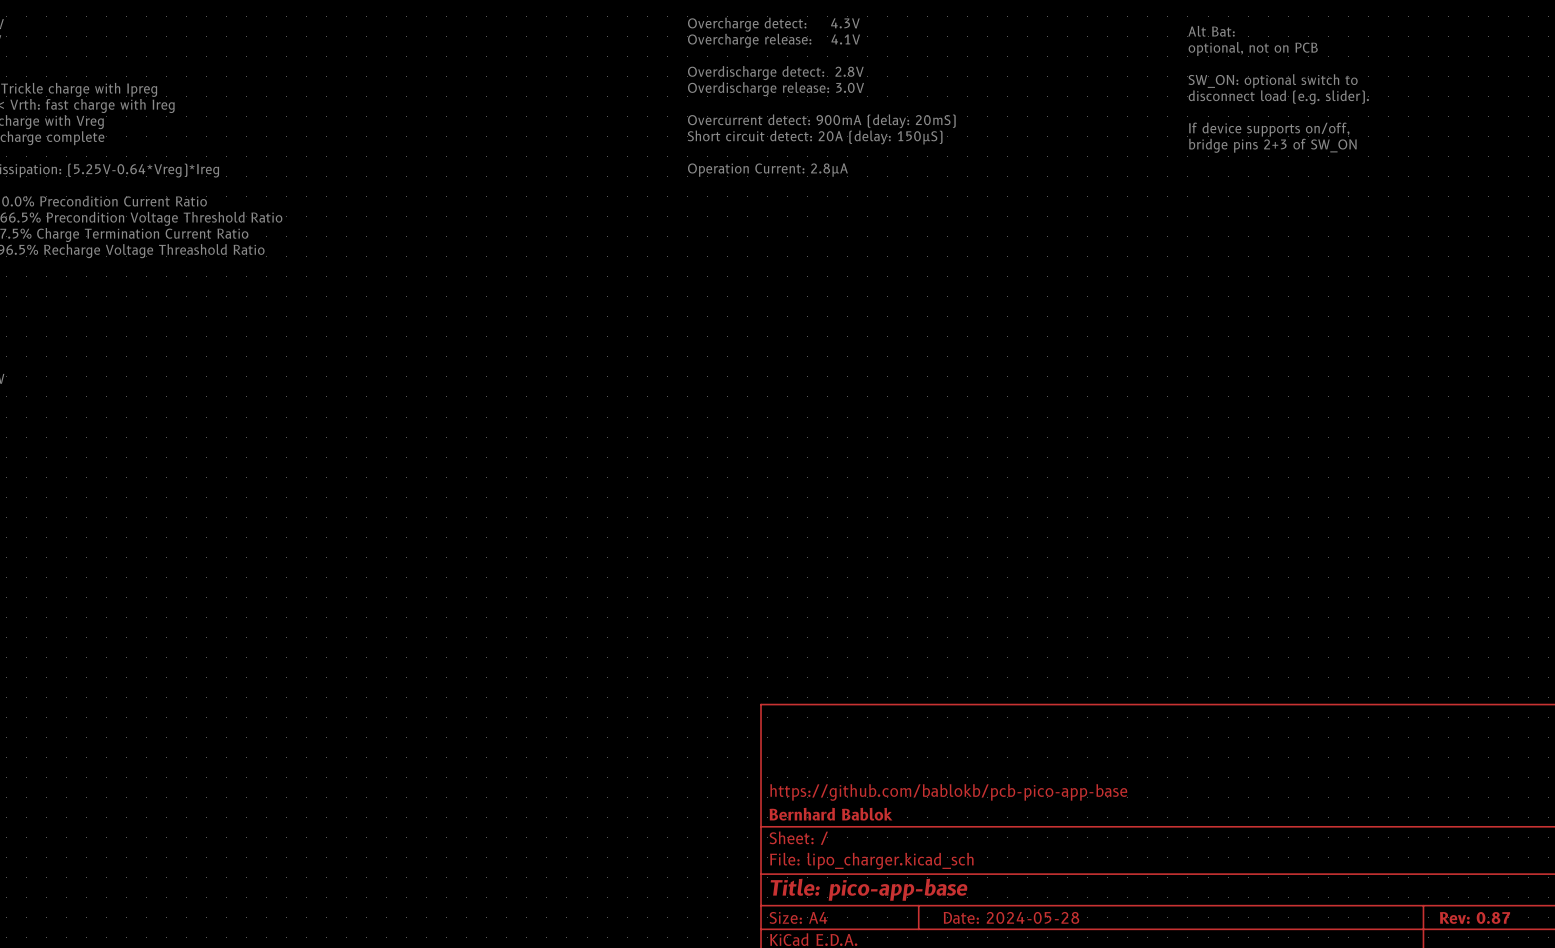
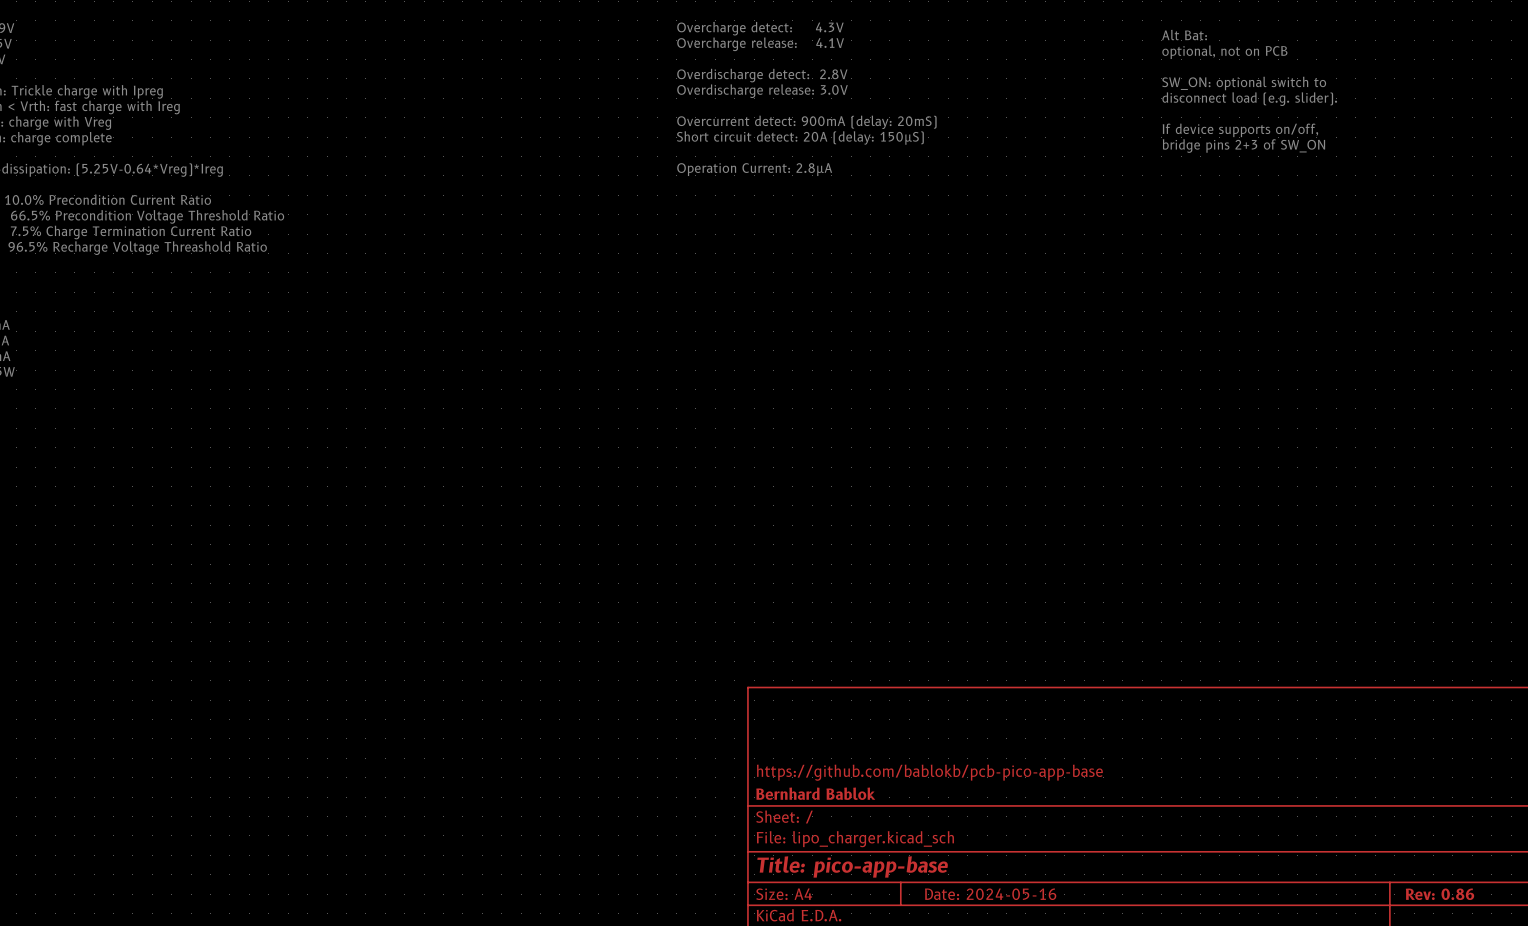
title block: Date: 2024-05-28 (1011, 917) -> Date: 2024-05-16 (990, 894)
title block: Rev: 0.87 (1475, 917) -> Rev: 0.86 (1439, 894)

